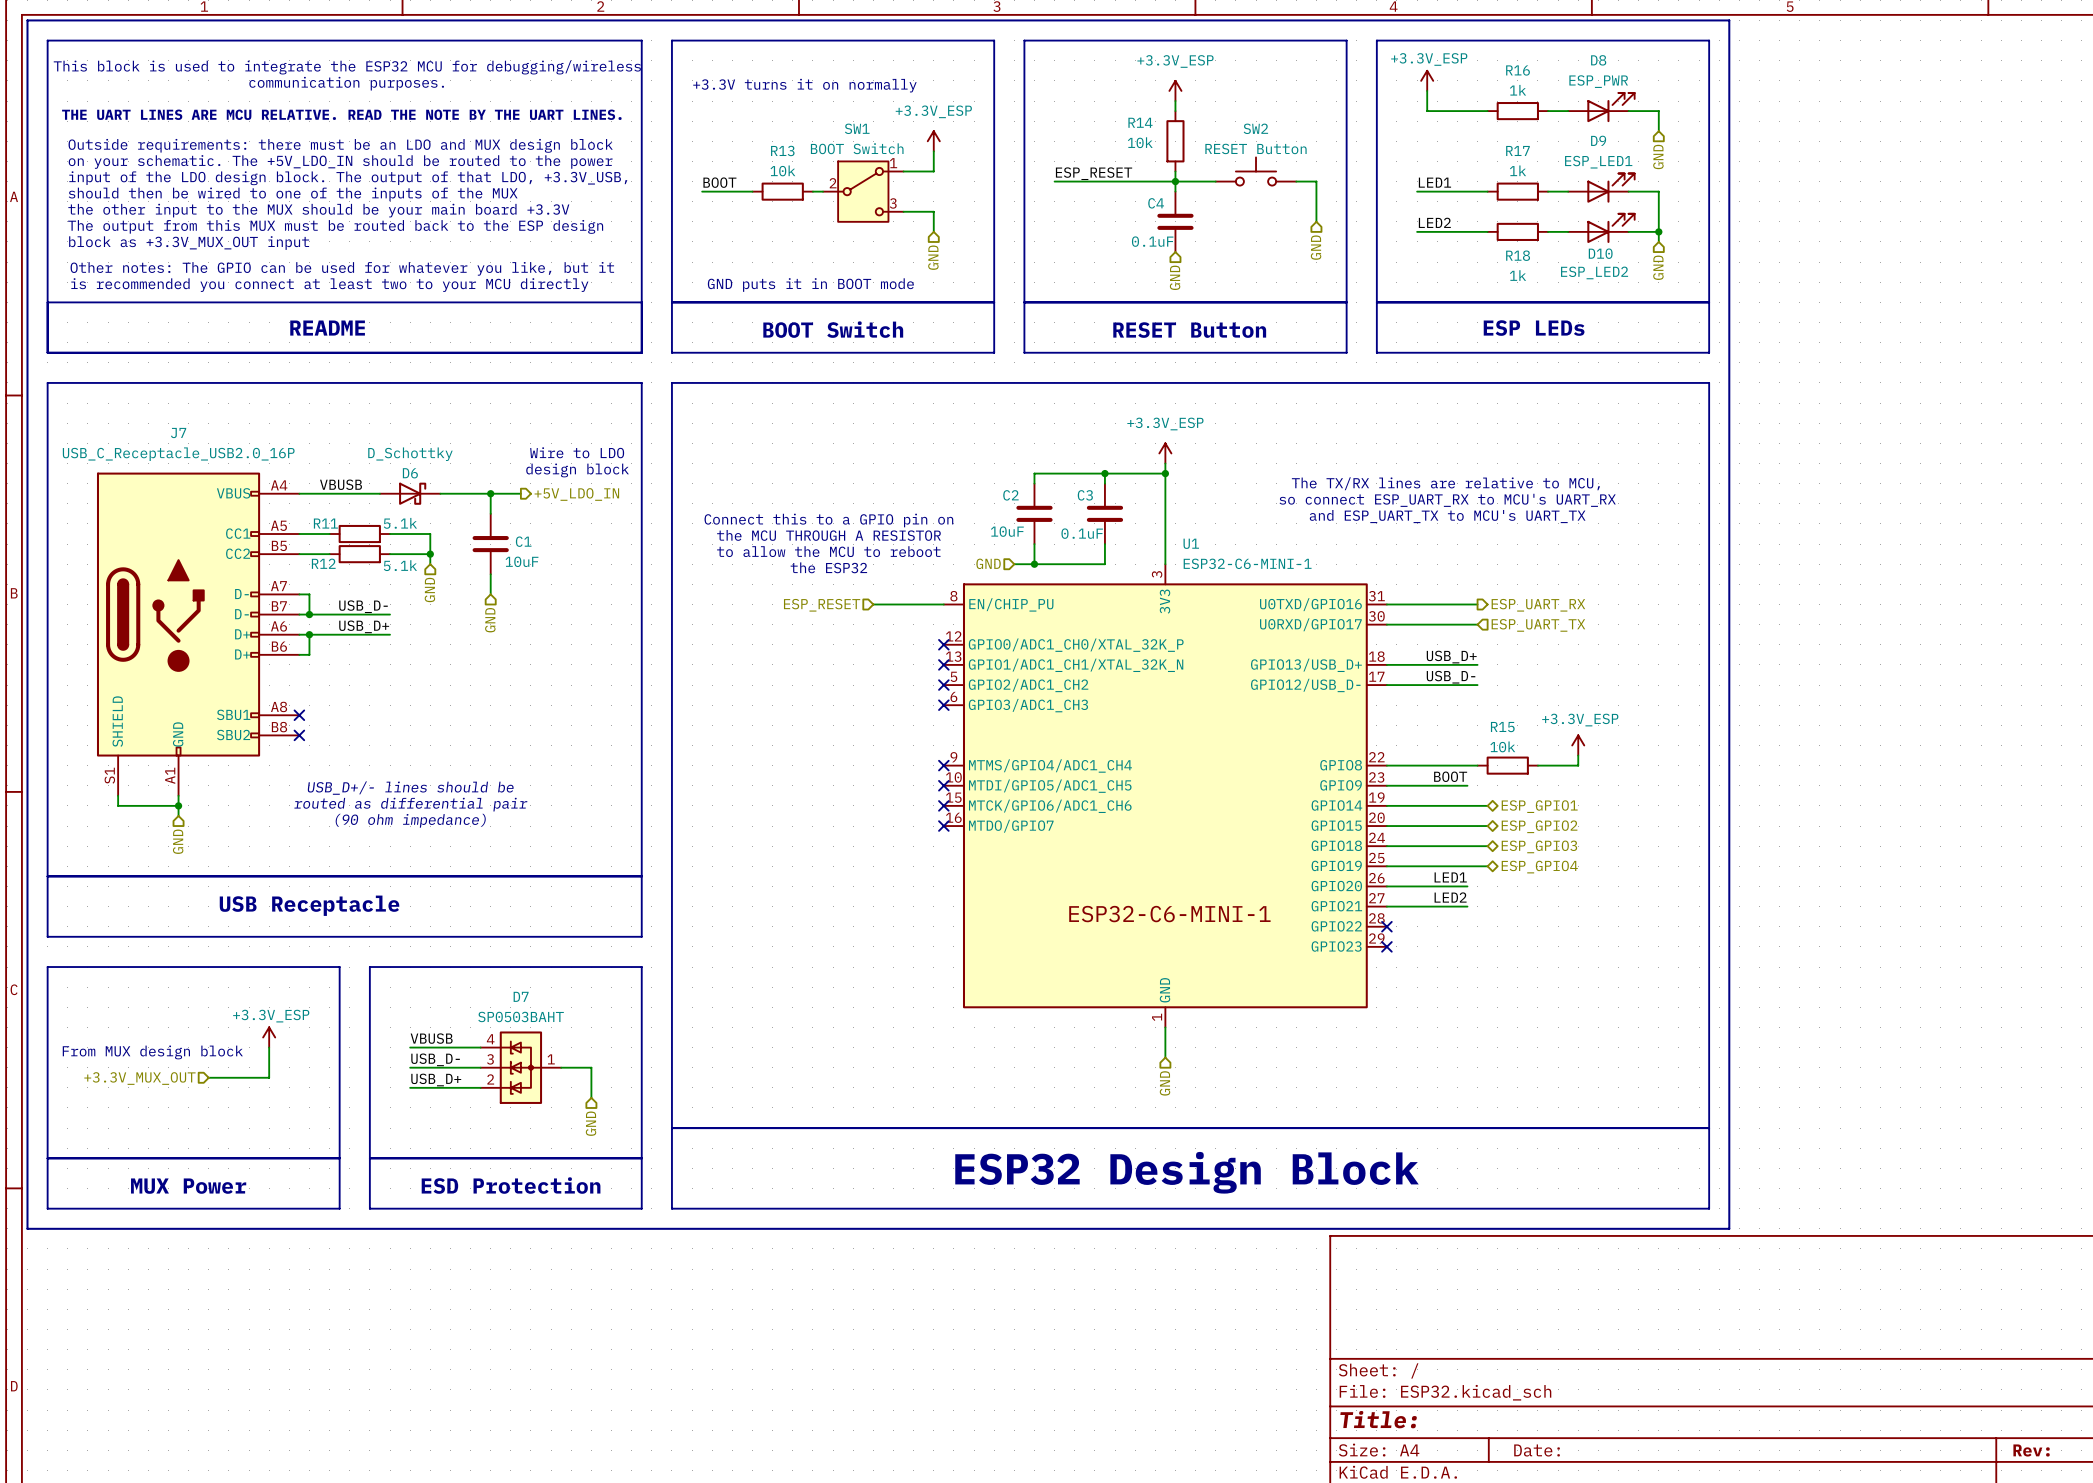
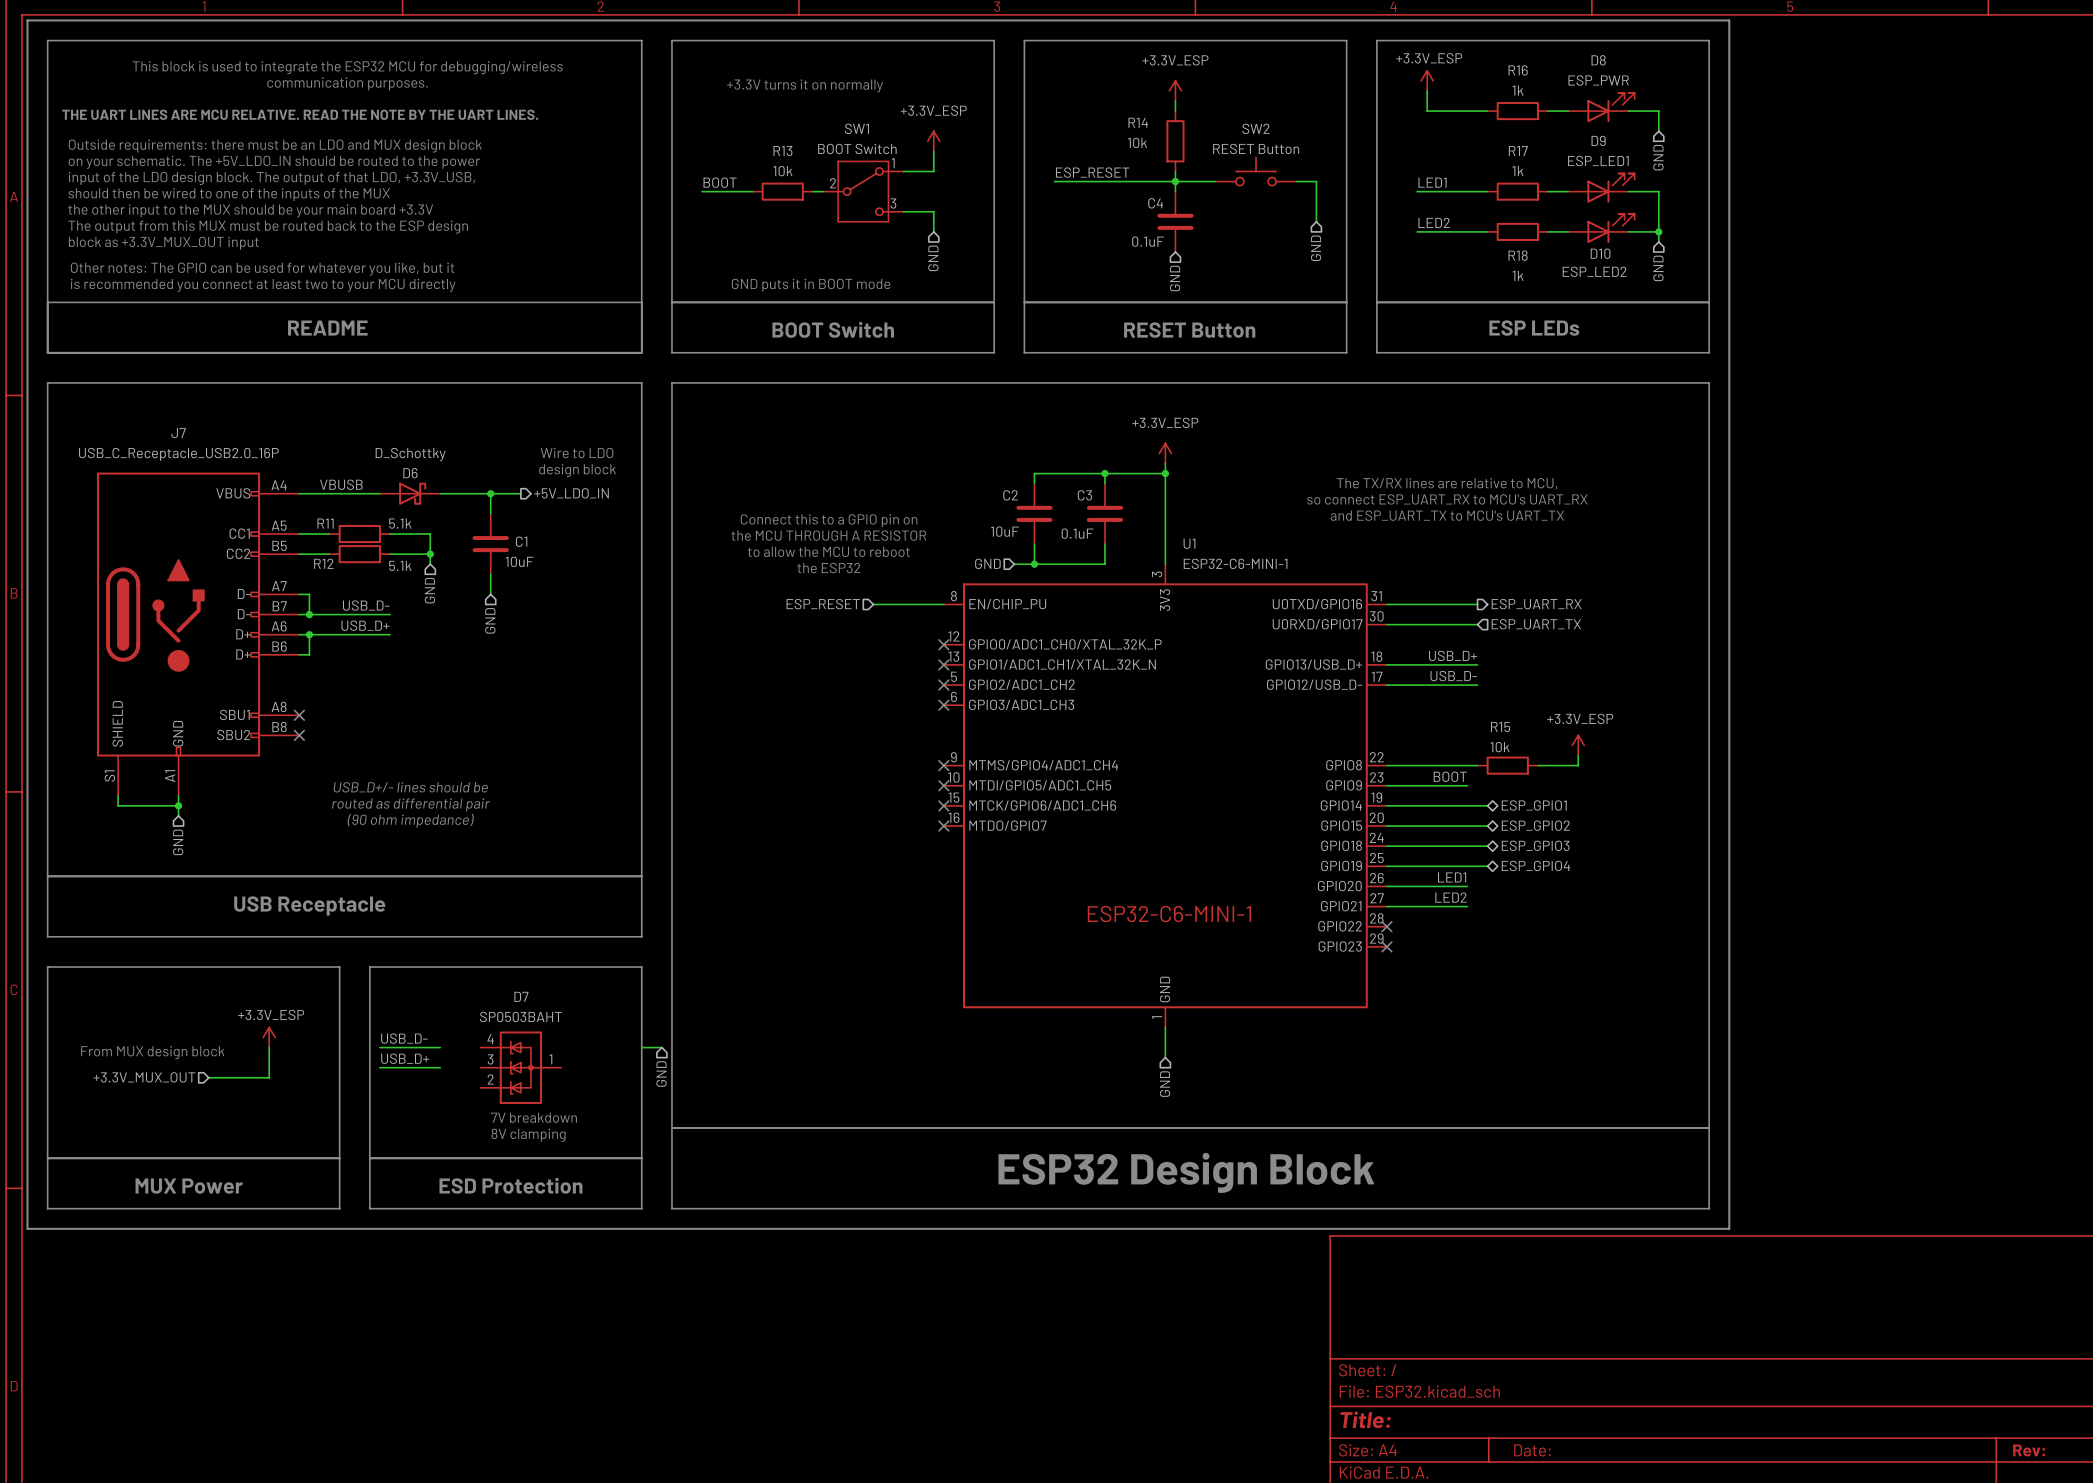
label: VBUSB (431, 1038) -> none
wire: none -> (379, 1047) (410, 1047)
wire: (440, 1047) (480, 1047) -> none
wire: none -> (641, 1047) (661, 1047)
label position: USB_D- (435, 1059) -> USB_D- (404, 1038)
wire: none -> (379, 1067) (410, 1067)
wire: (440, 1067) (480, 1067) -> none
wire: (561, 1067) (591, 1067) (591, 1097) -> none
label position: USB_D+ (436, 1079) -> USB_D+ (405, 1058)
wire: (410, 1087) (480, 1087) -> none
text: none -> 7V breakdown (534, 1117)
hierarchical label position: GND (591, 1123) -> GND (661, 1074)
text: none -> 8V clamping (528, 1135)

